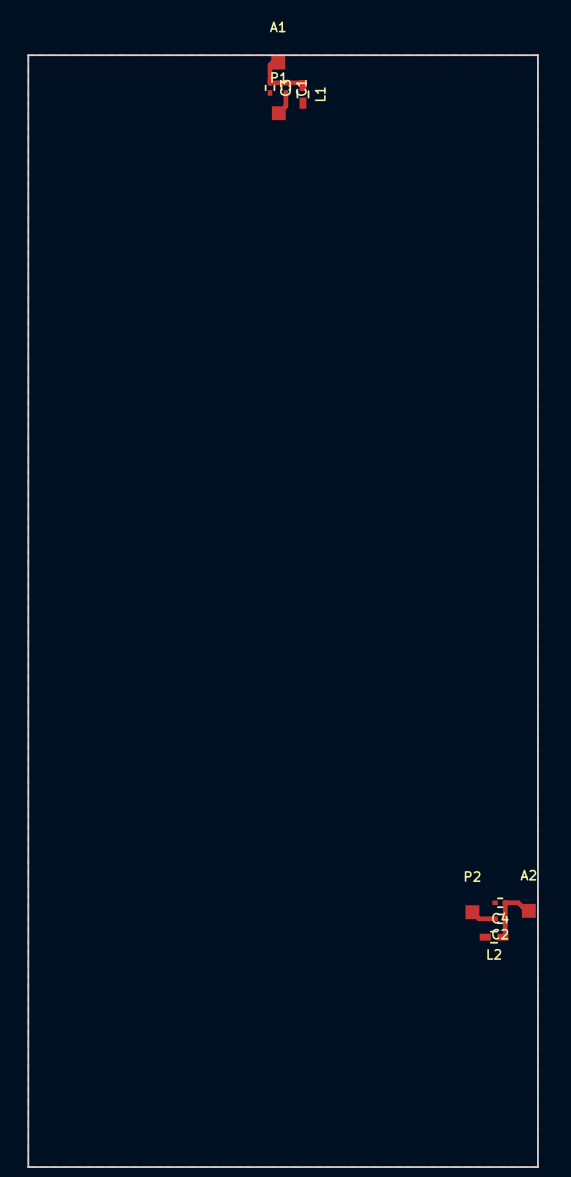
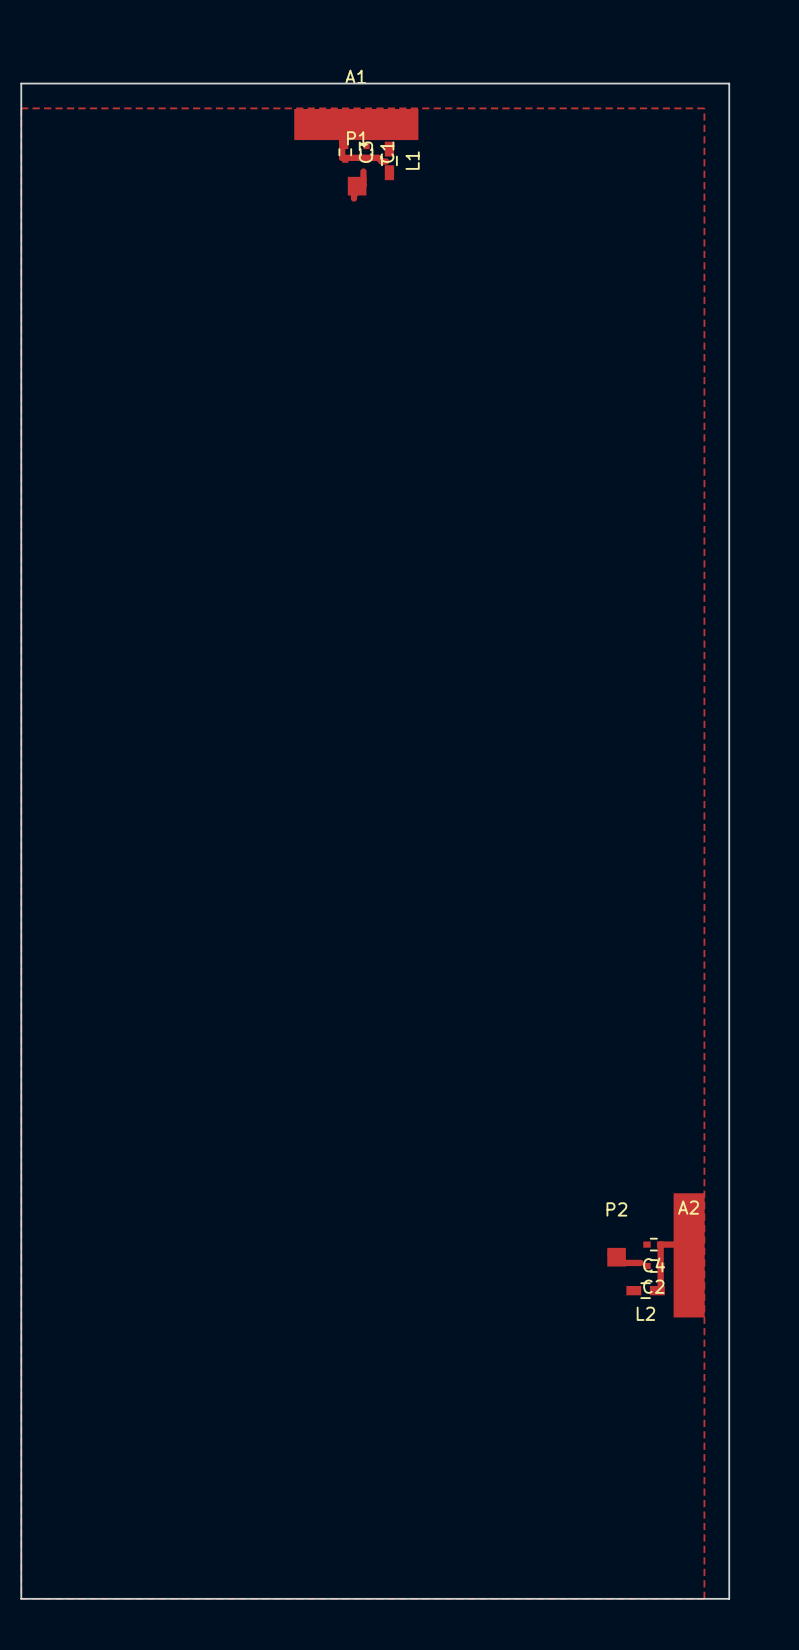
board edge: (28, 55) (537, 55) (537, 1167) -> (21, 108) (21, 83) (729, 83) (729, 1598) (704, 1598)
A1 footprint: [271, 55, 286, 70] -> [294, 109, 419, 141]
top track: (278, 62) (272, 62) (270, 64) (270, 82) (300, 82) (302, 85) -> none
top track: none -> (356, 124) (356, 127) (342, 141) (342, 157) (378, 157) (381, 161) (386, 161)
top track: (285, 92) (285, 106) (278, 113) -> none
top track: none -> (363, 171) (363, 185) (354, 194) (354, 198)
A2 footprint: [521, 903, 536, 918] -> [673, 1193, 705, 1318]
top track: none -> (610, 1254) (615, 1254) (624, 1262) (640, 1262)
top track: (472, 912) (479, 918) (495, 918) -> none

